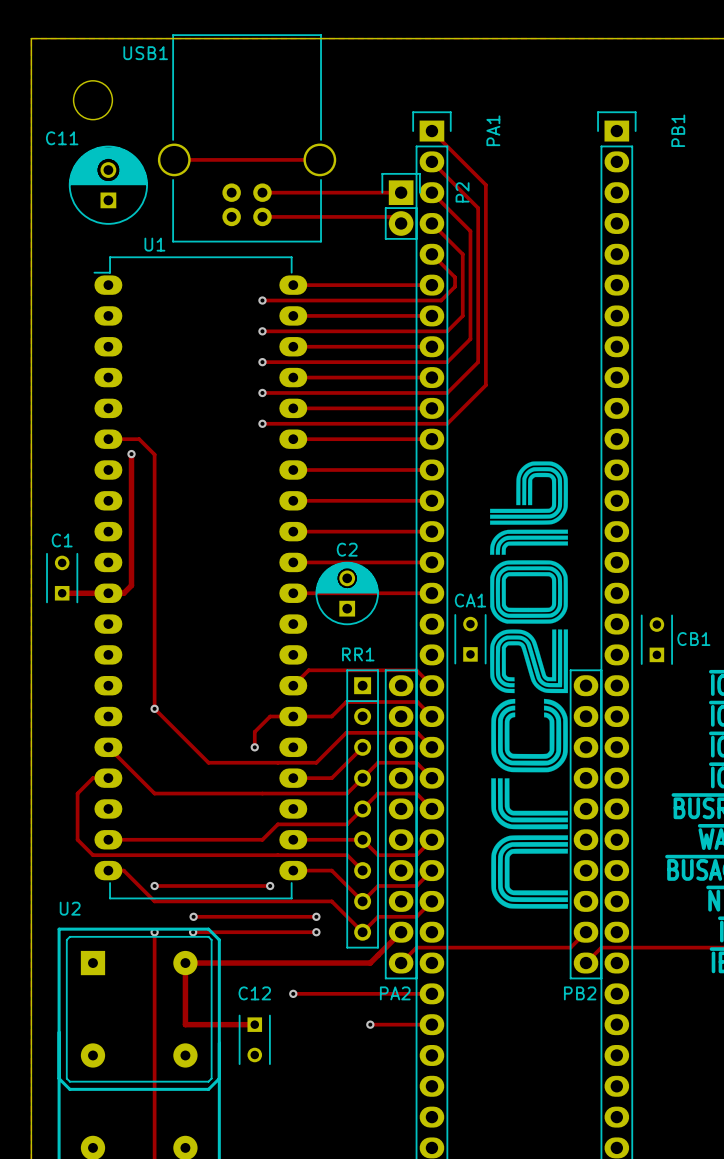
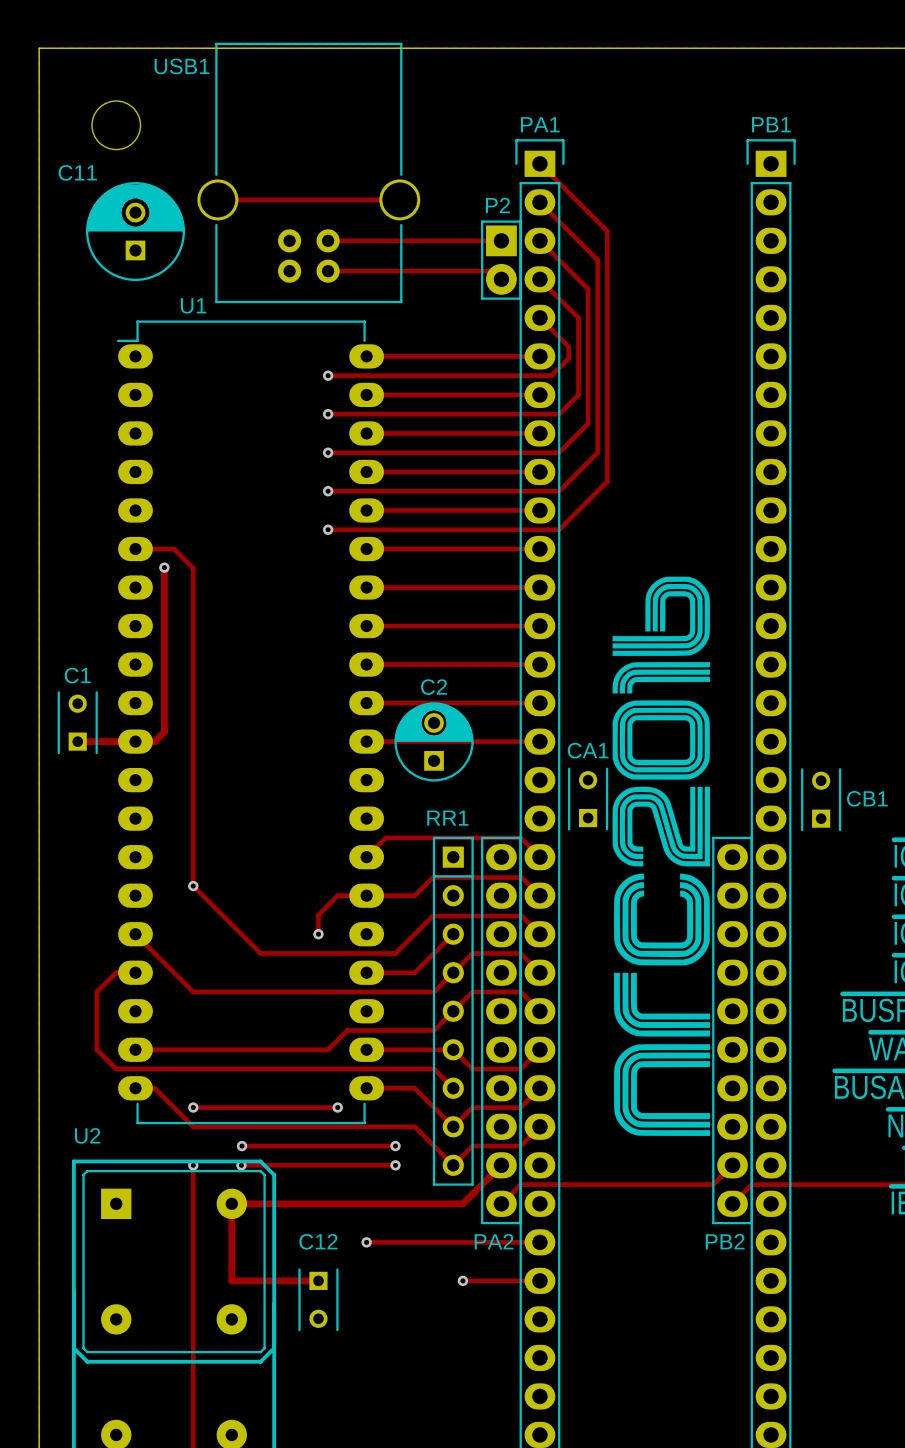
PA1 name rotation: 0° (493, 130) -> 90° clockwise (540, 124)
PA1 name position: PA1 (493, 130) -> PA1 (540, 124)
PB1 name rotation: 0° (678, 130) -> 90° clockwise (771, 124)
PB1 name position: PB1 (678, 130) -> PB1 (771, 124)
P2 footprint: [381, 172, 421, 240] -> [481, 220, 522, 300]
P2 name position: P2 (462, 192) -> P2 (497, 205)

